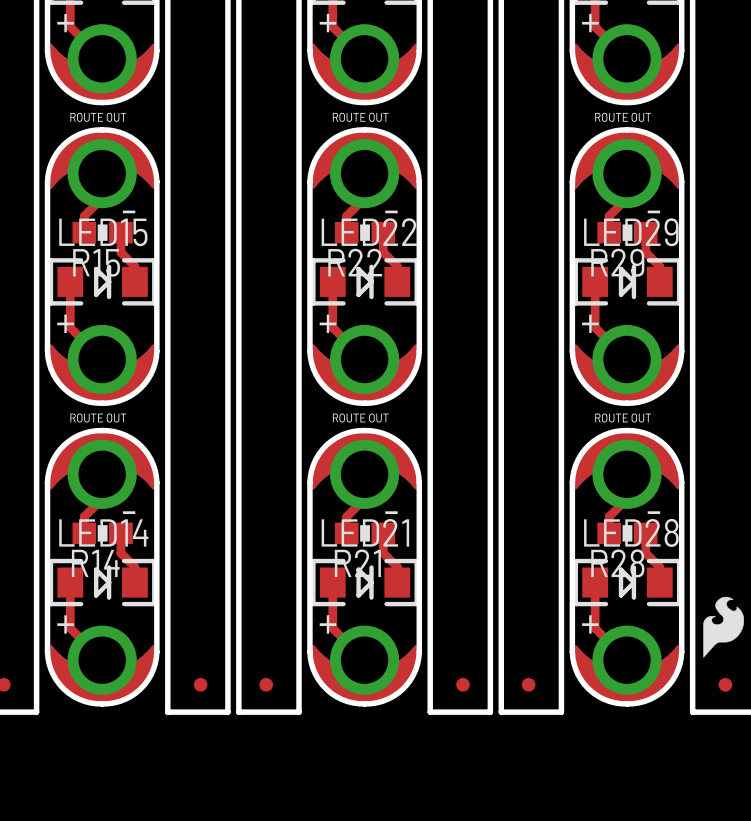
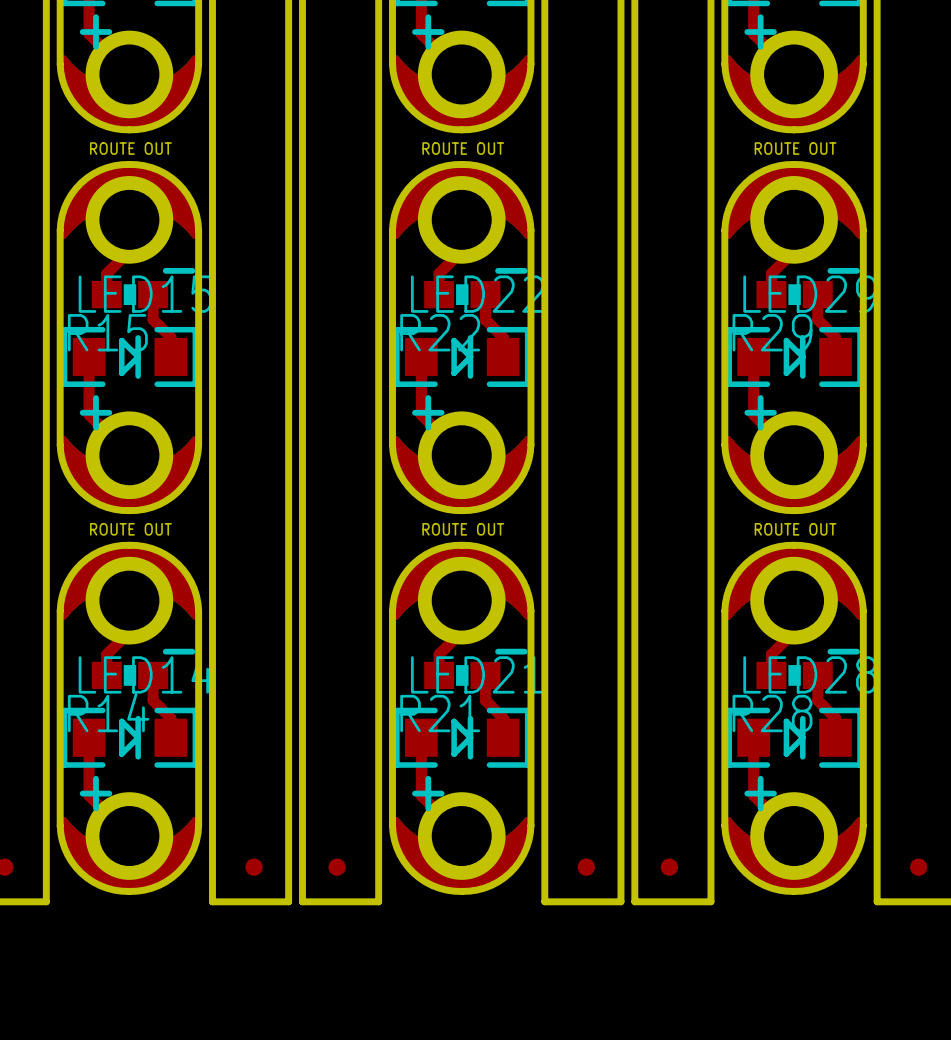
drawing: [703, 596, 745, 658] -> none

